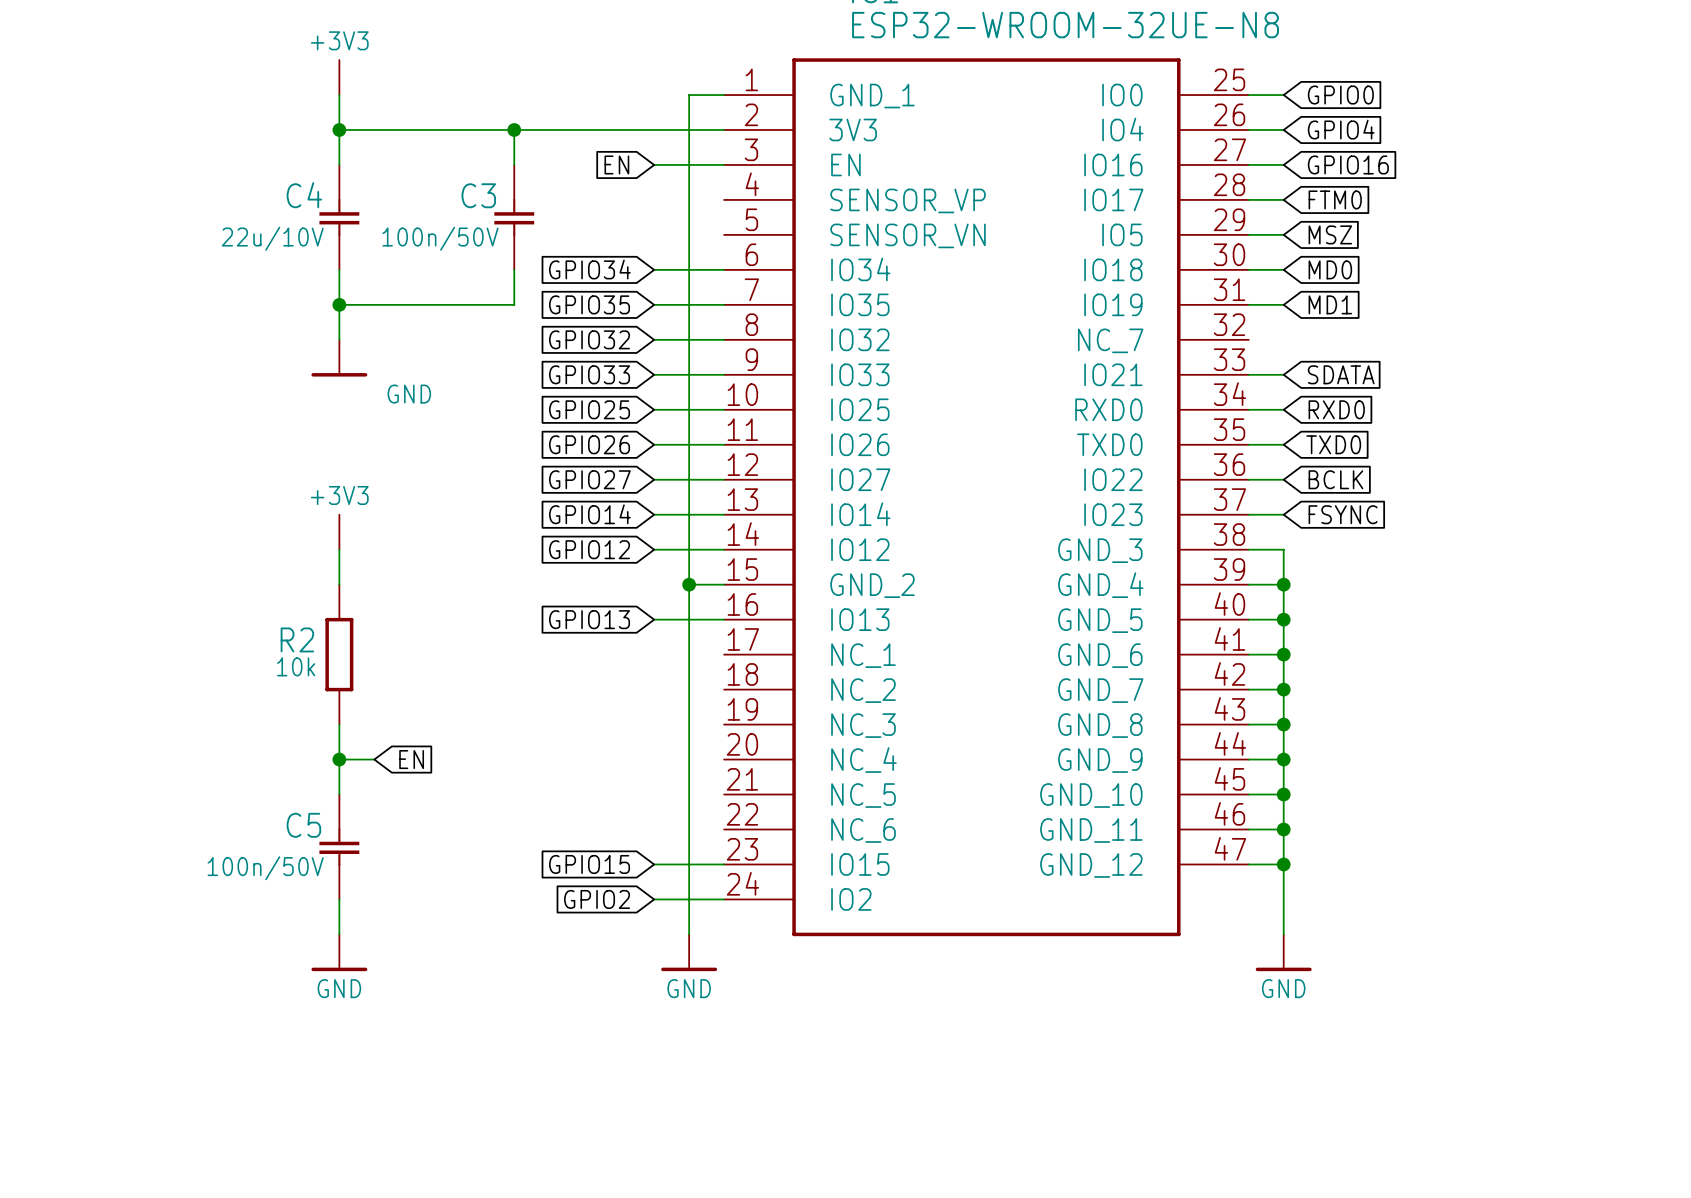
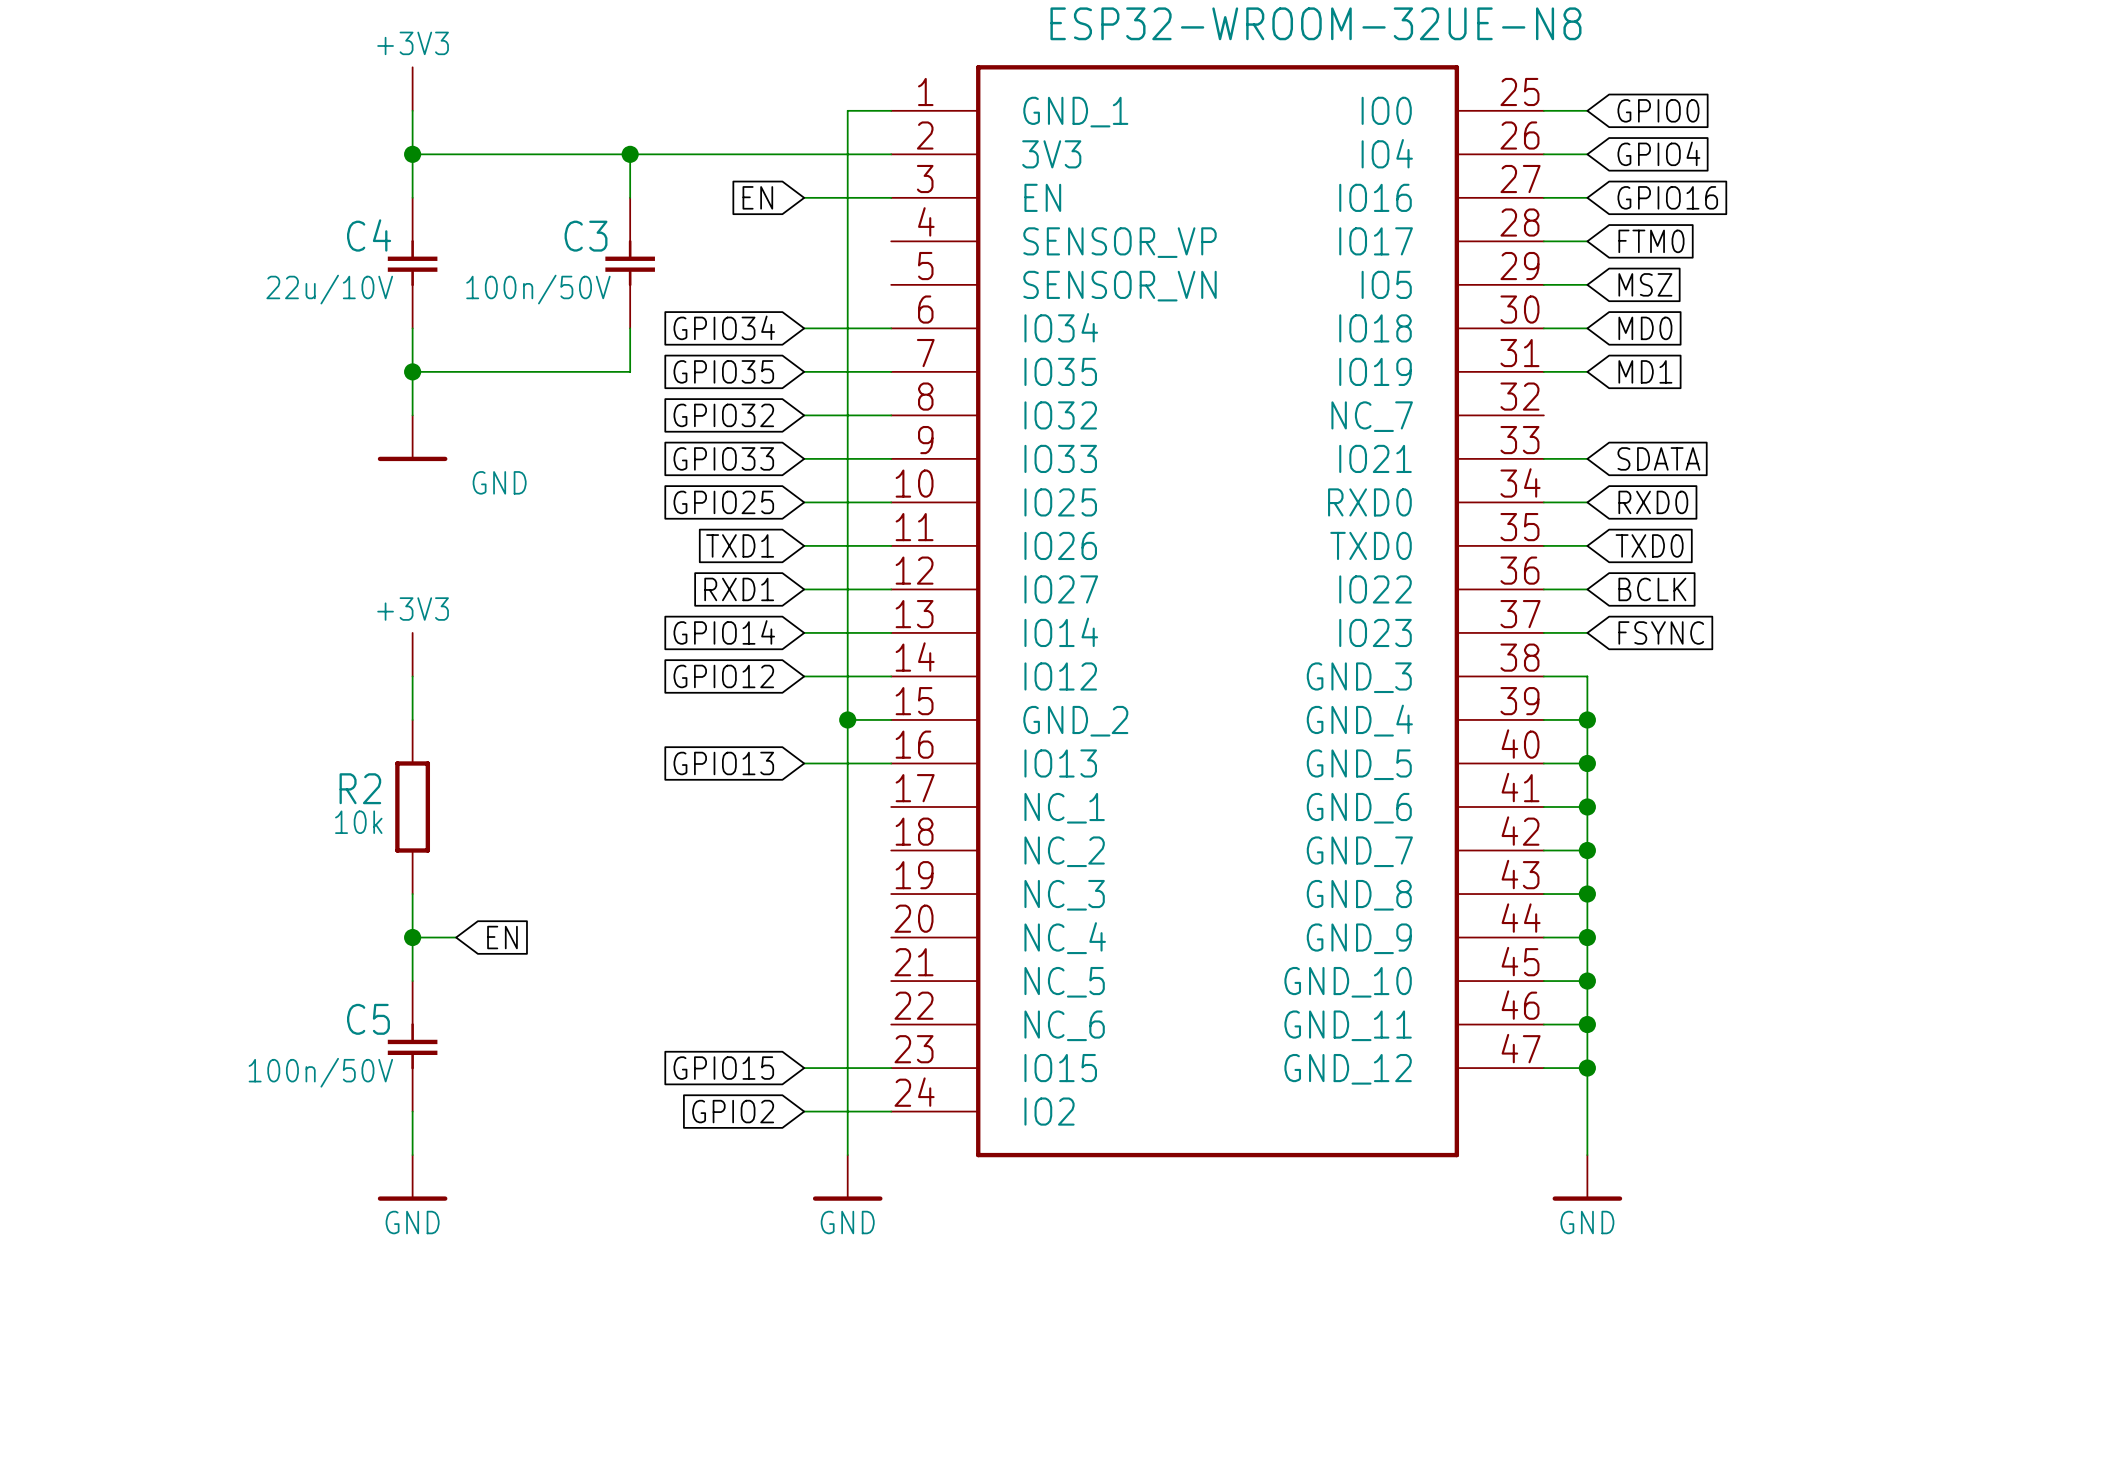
global label: GPIO26 (589, 444) -> TXD1 (740, 545)
global label: GPIO27 (589, 479) -> RXD1 (739, 589)

